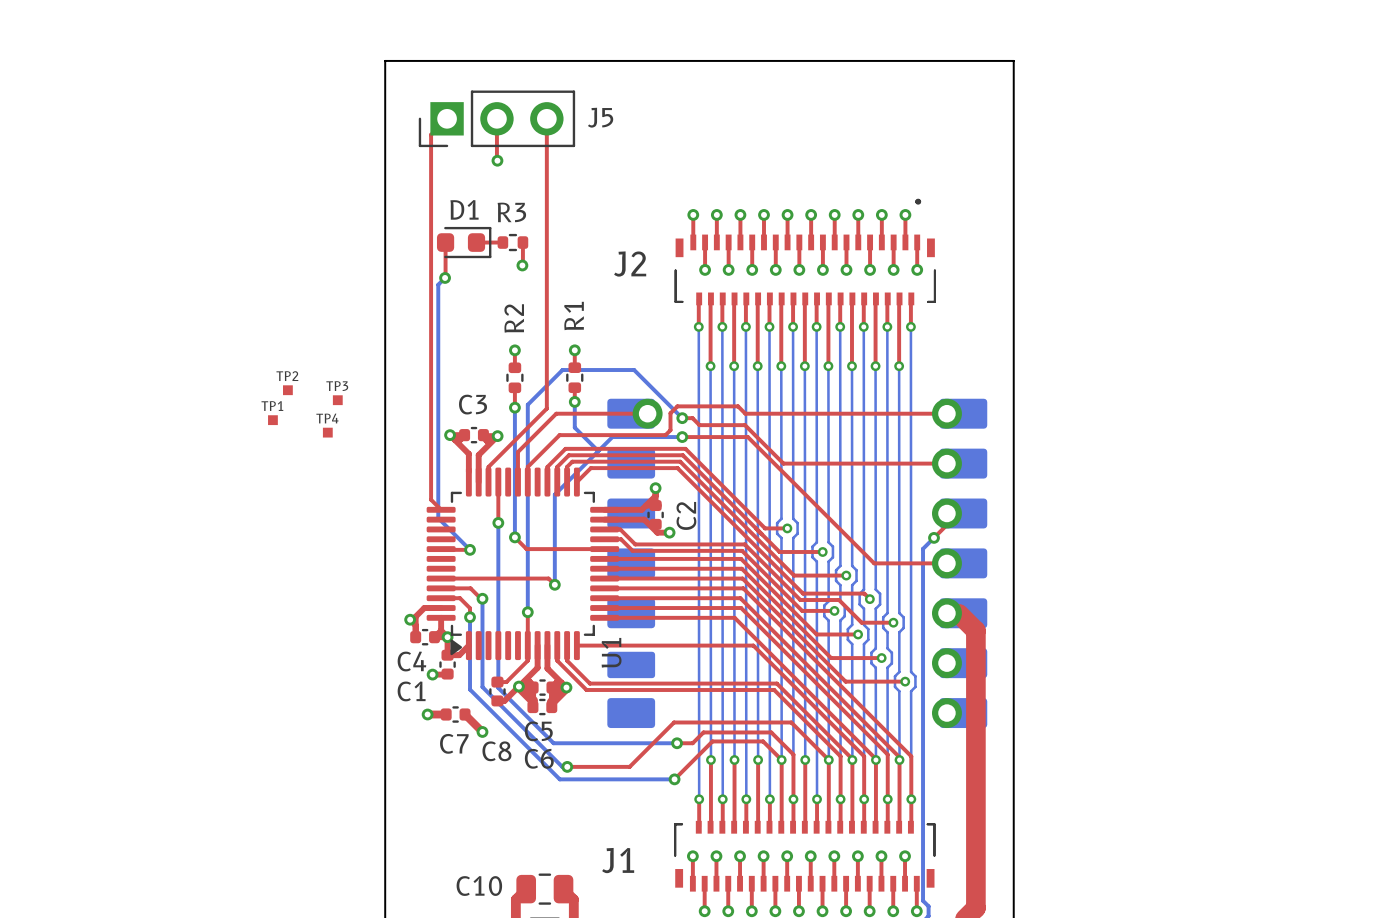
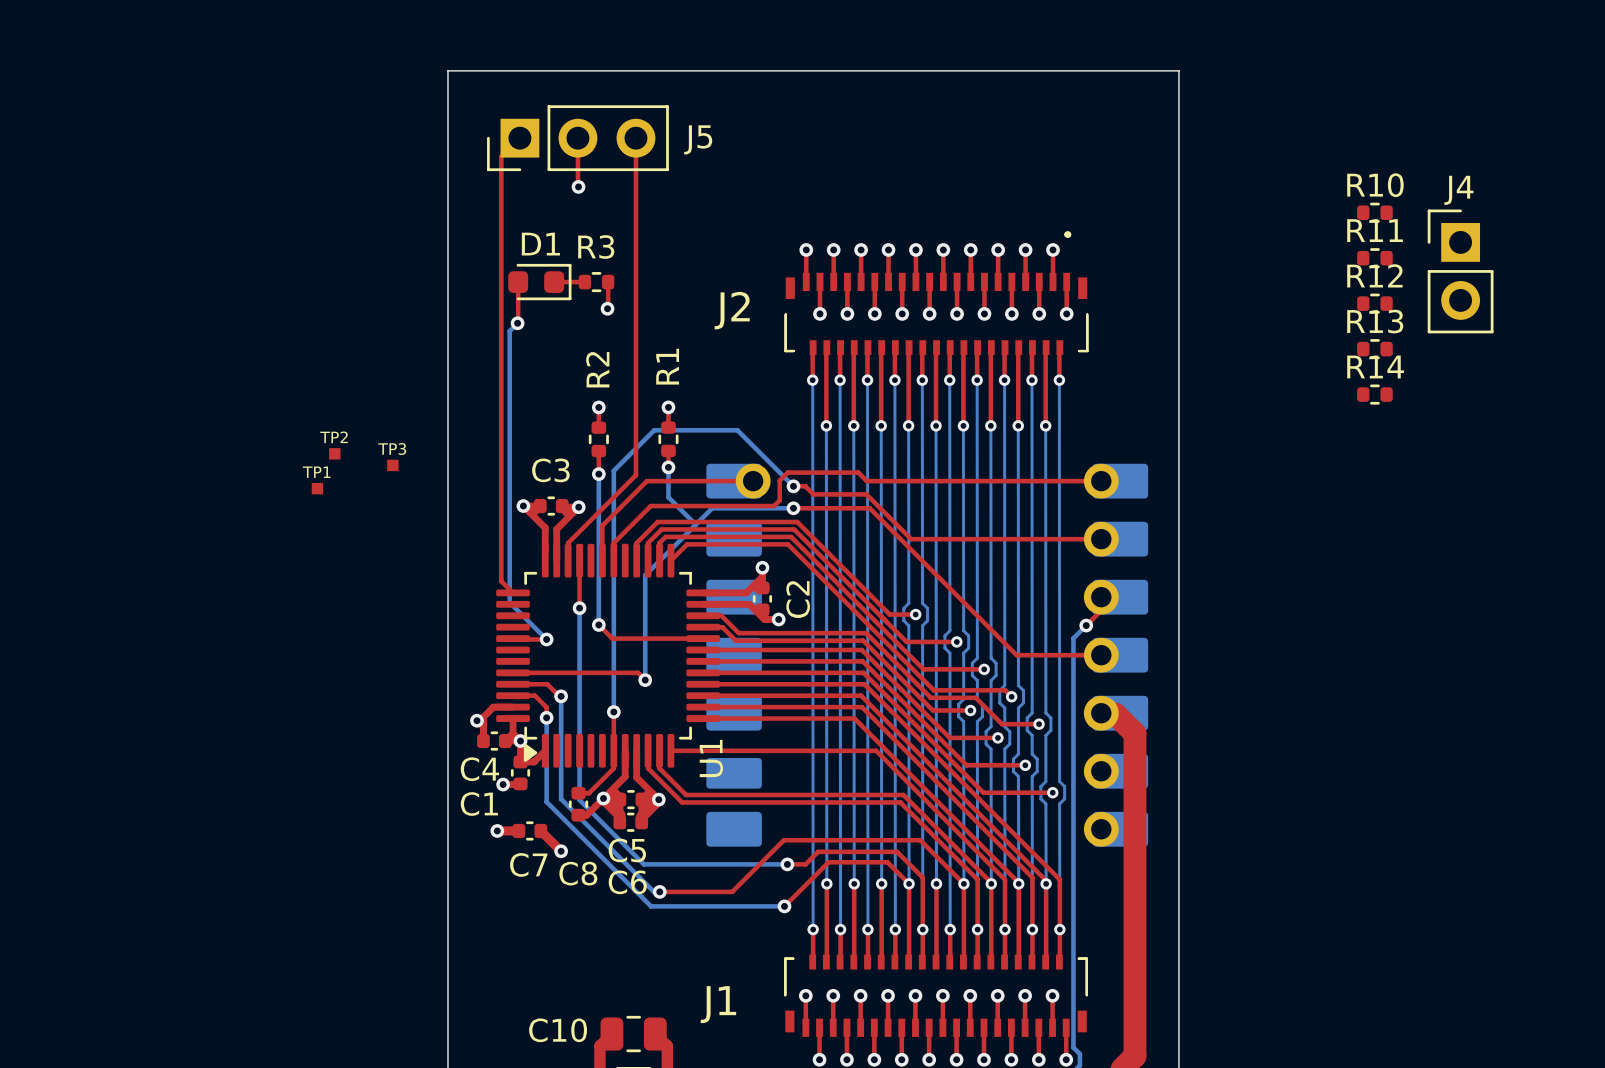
R10: none -> (1374, 212)
R11: none -> (1374, 258)
J4: none -> (1460, 271)
R12: none -> (1374, 303)
R13: none -> (1374, 349)
R14: none -> (1374, 394)
TP4: (327, 432) -> none

